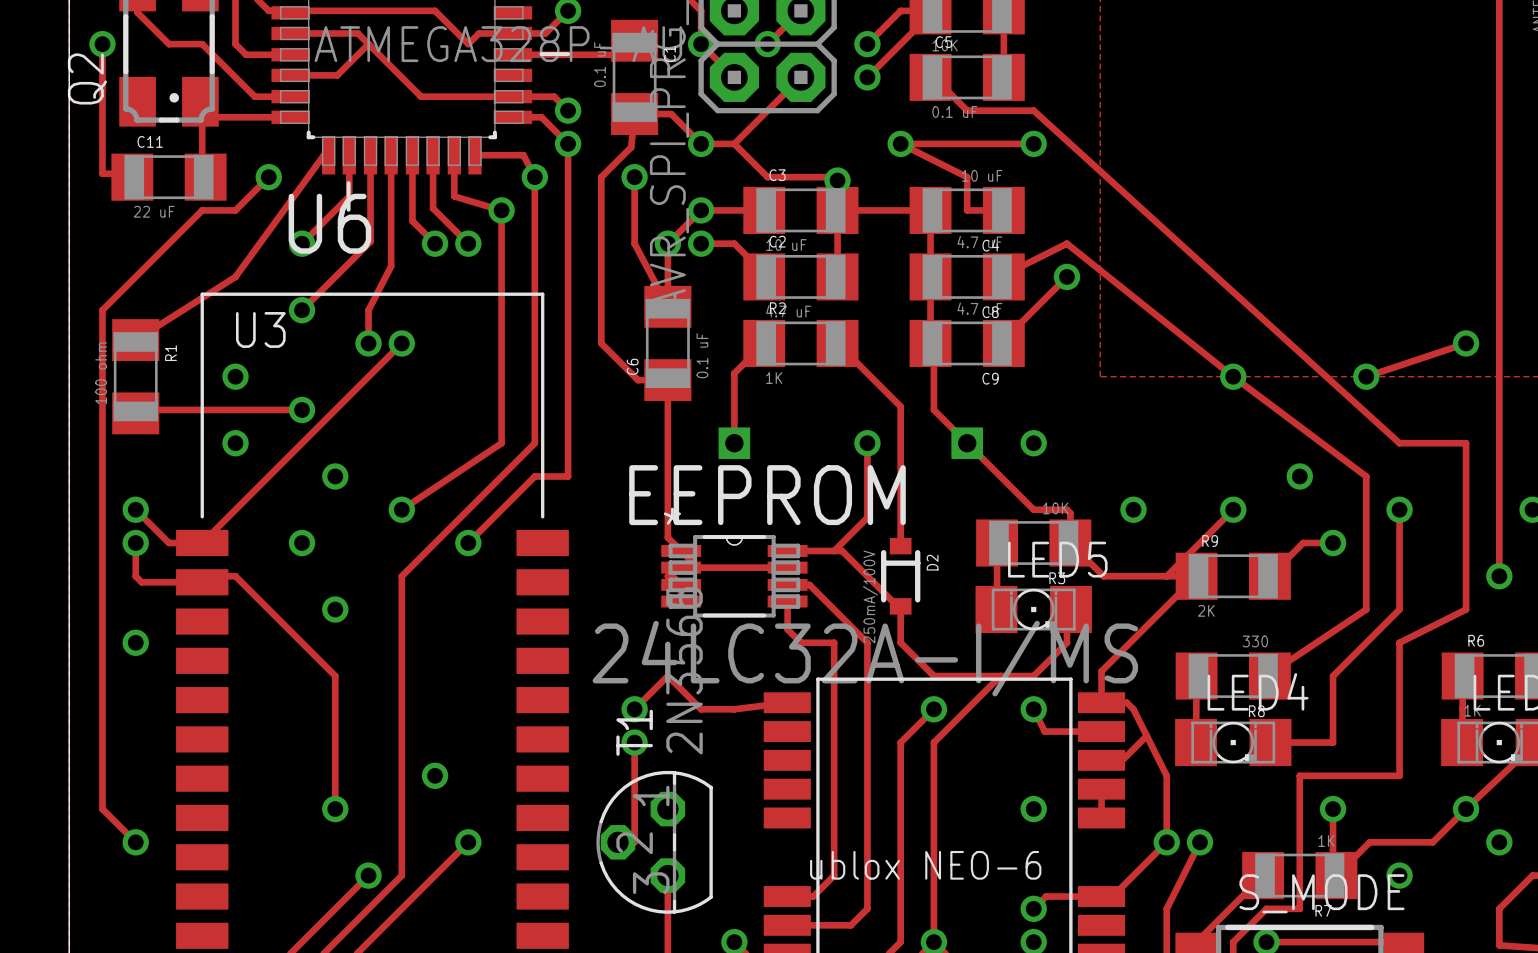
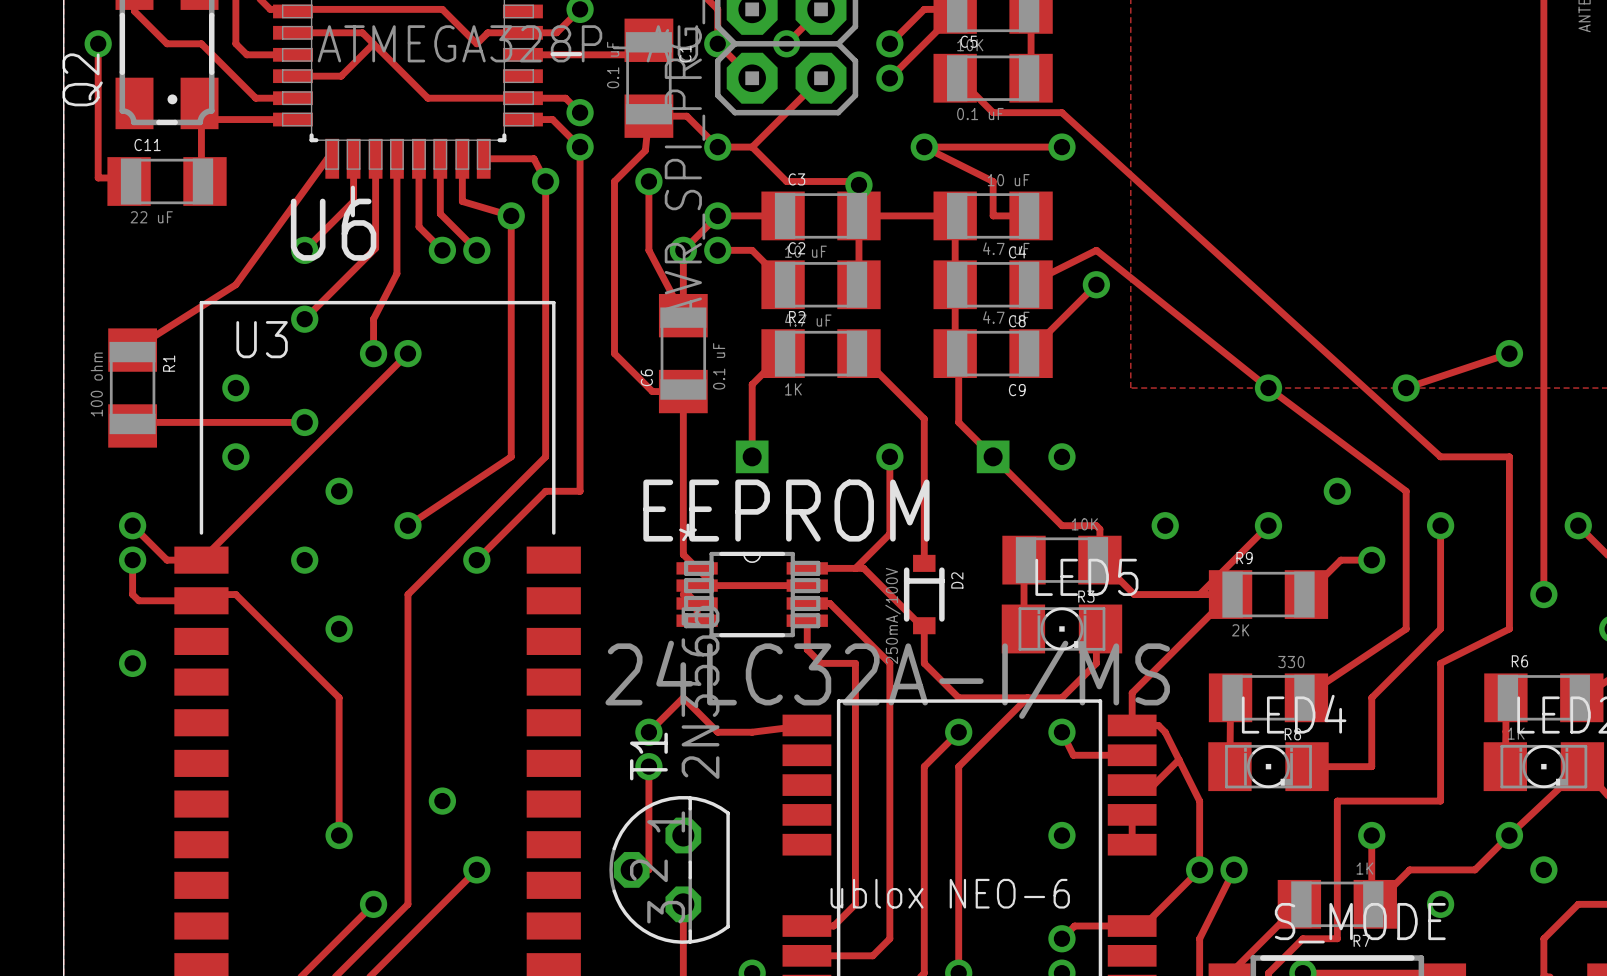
track: (268, 177) (235, 210) (202, 210) (102, 310) (102, 809) (135, 842) -> none
via: (268, 177) -> none
via: (135, 842) -> none

